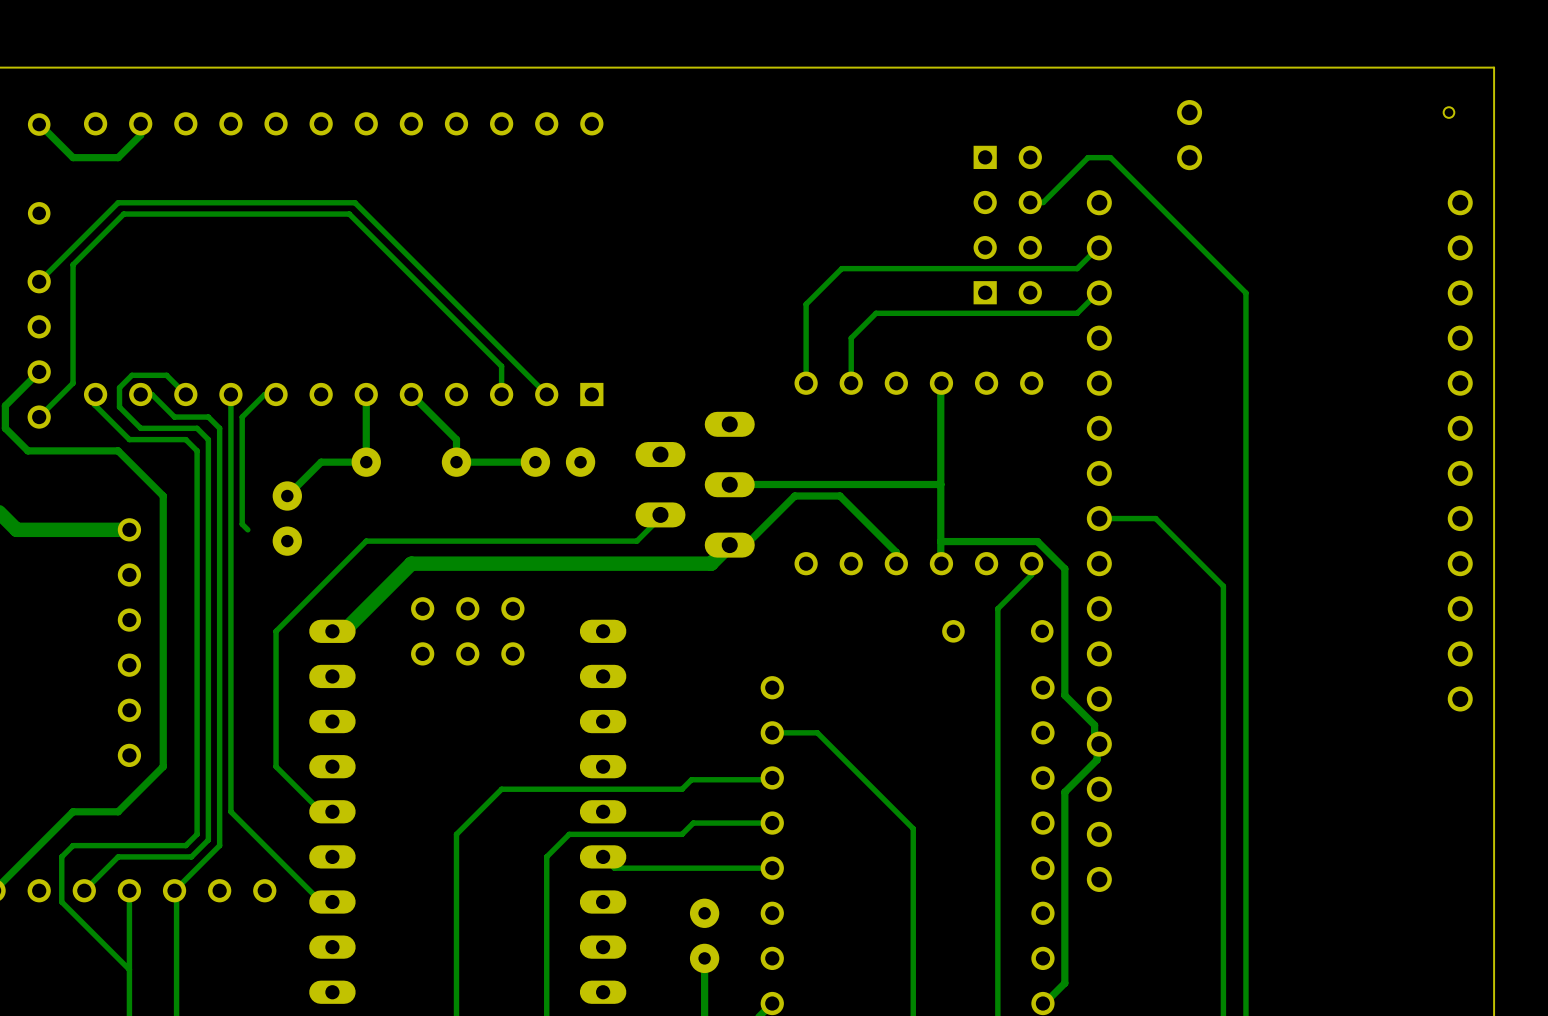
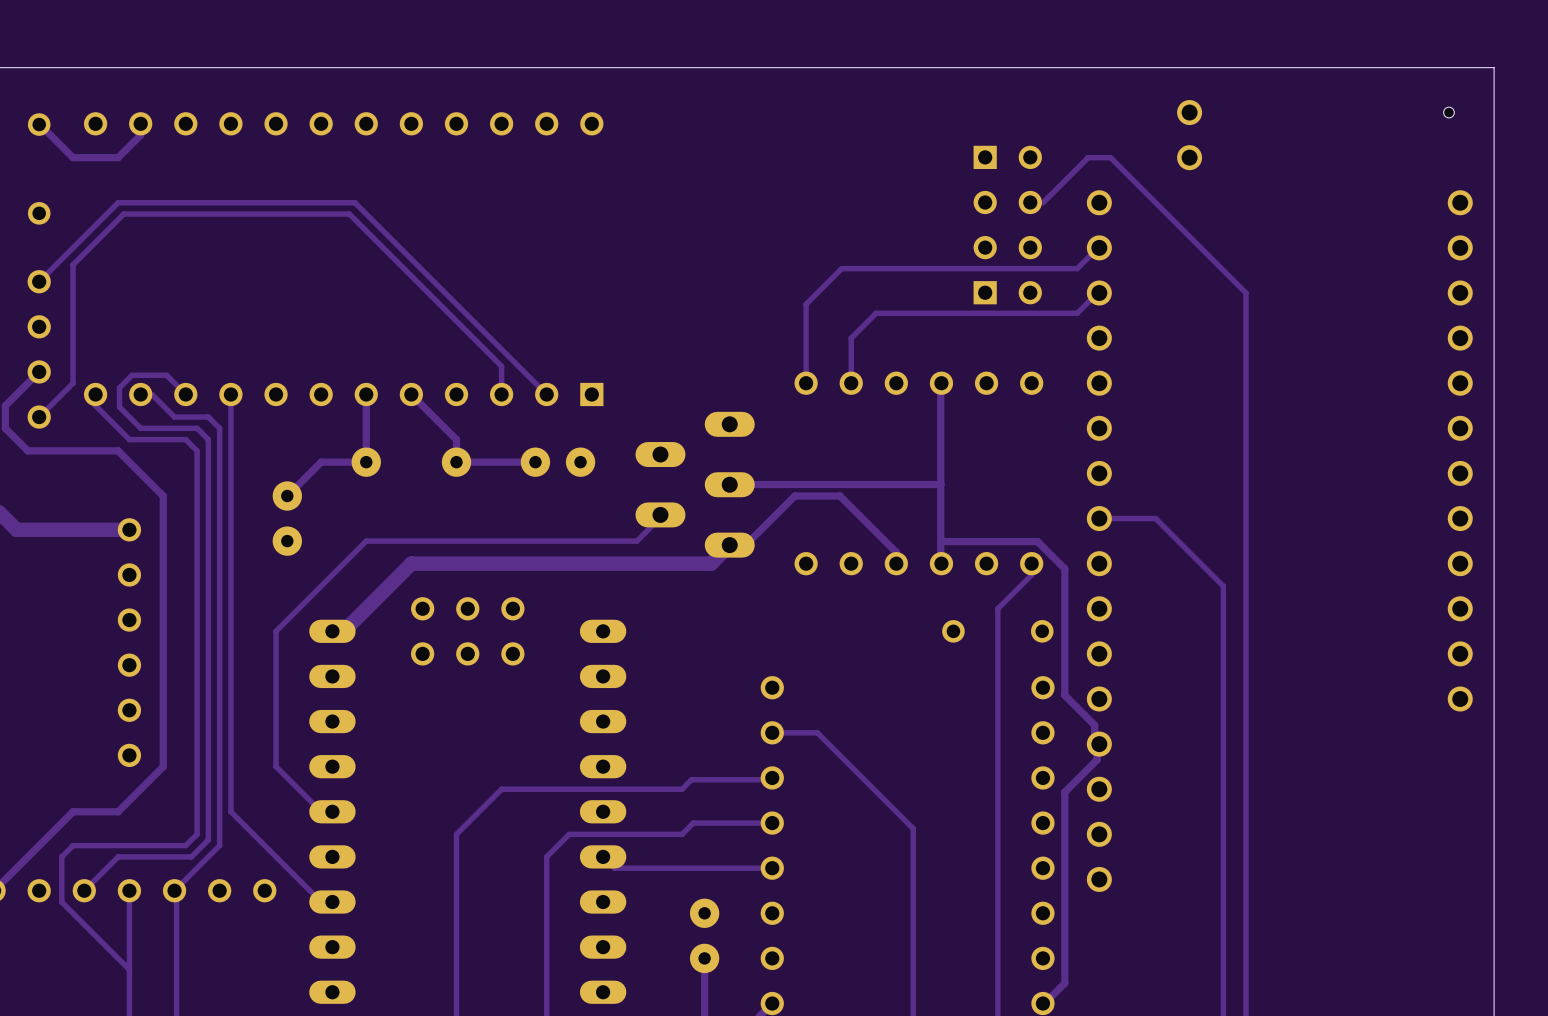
track: (276, 394) (264, 394) (242, 417) (242, 524) (247, 529) -> none

